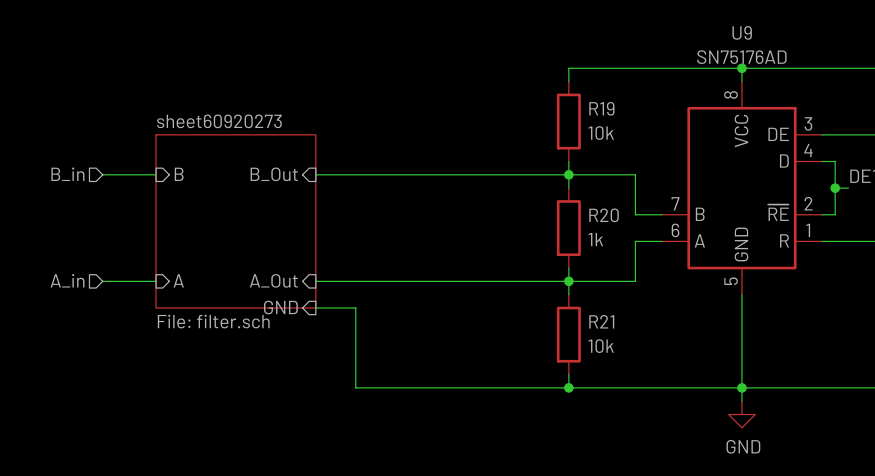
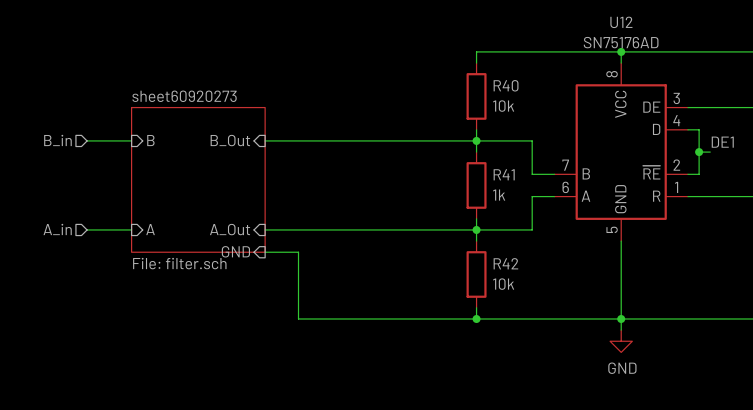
U9 name: U9 (742, 32) -> U12 (621, 22)
R19 name: R19 (601, 108) -> R40 (506, 85)
R20 name: R20 (604, 215) -> R41 (504, 174)
R21 name: R21 (601, 321) -> R42 (505, 263)

